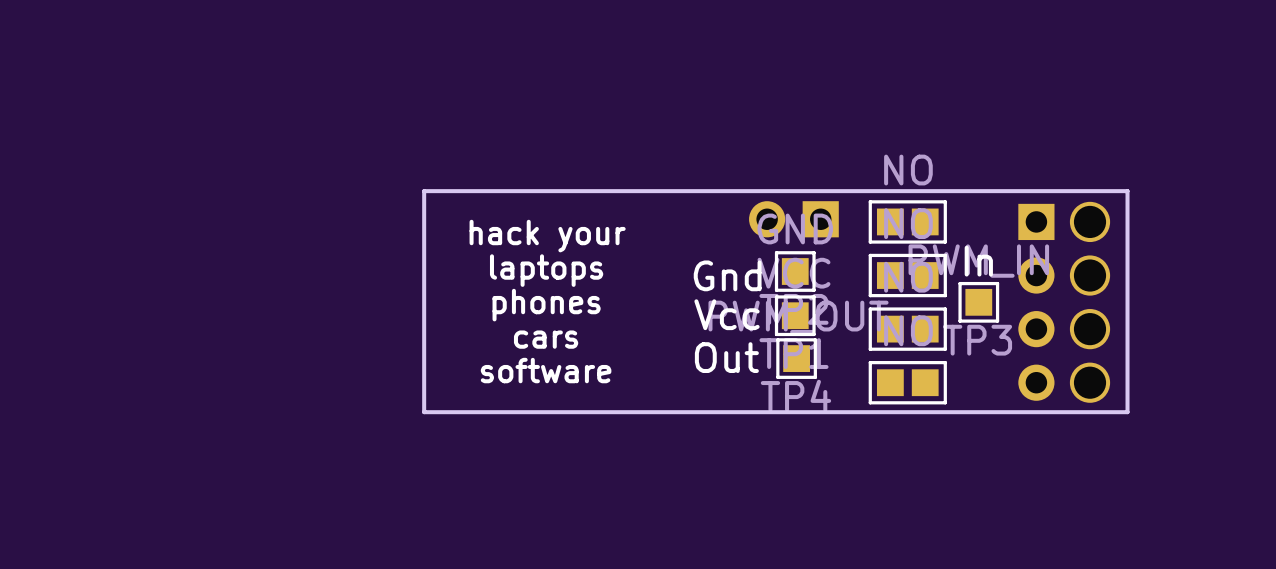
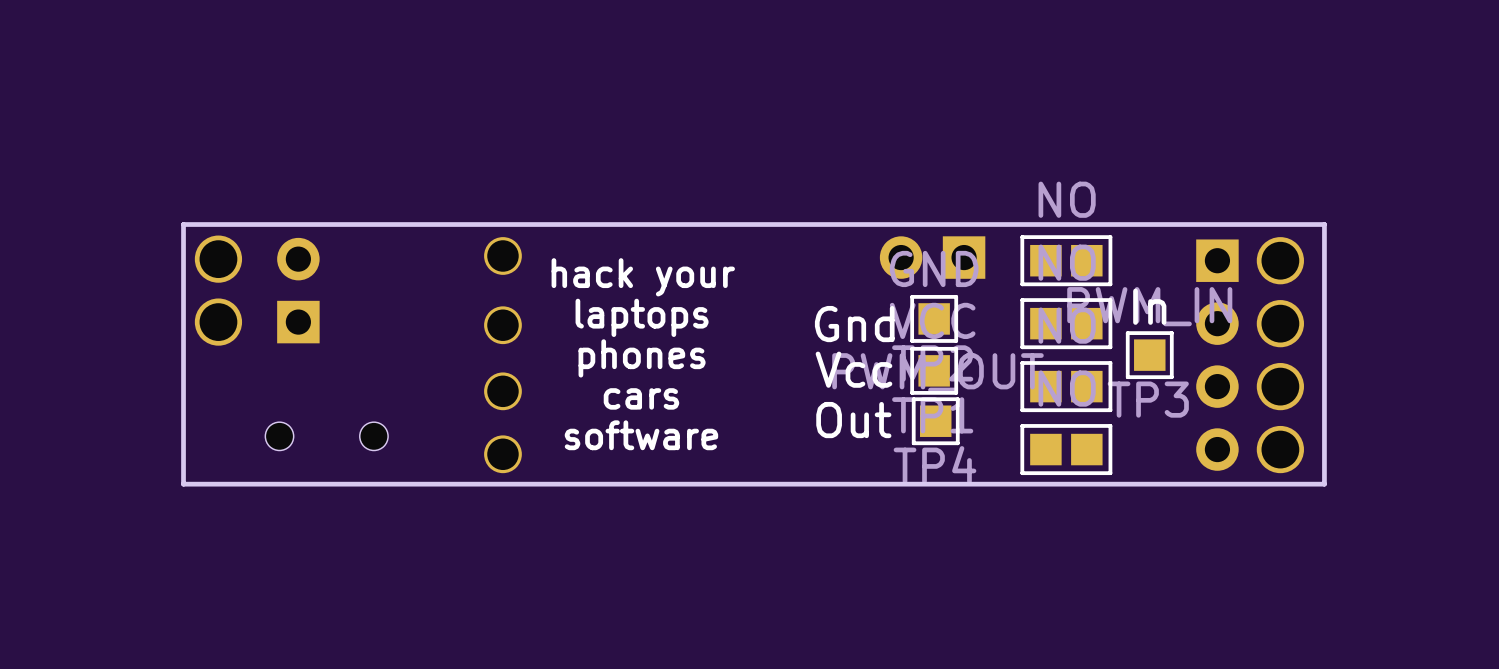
board edge: (424, 191) (424, 412) -> (498, 224) (183, 224) (183, 484) (498, 484)
part: none -> (502, 255)
part: none -> (257, 290)
part: none -> (502, 325)
part: none -> (502, 391)
part: none -> (326, 436)
part: none -> (502, 454)

